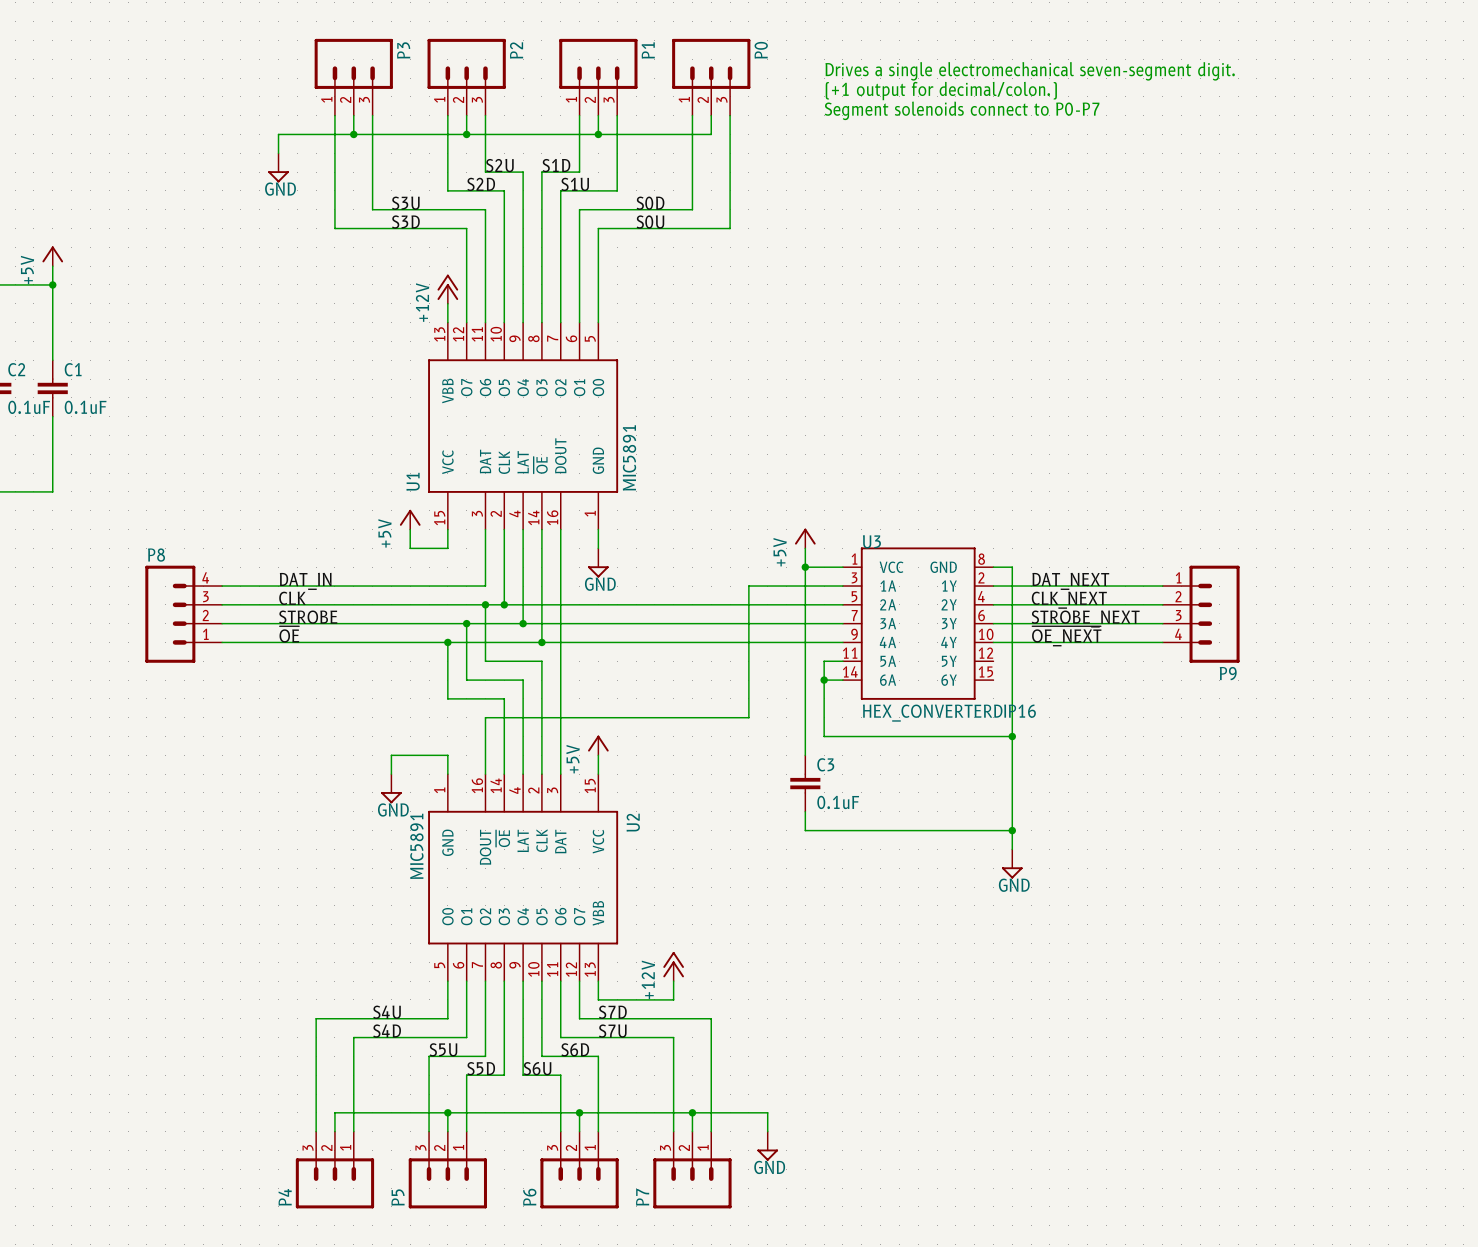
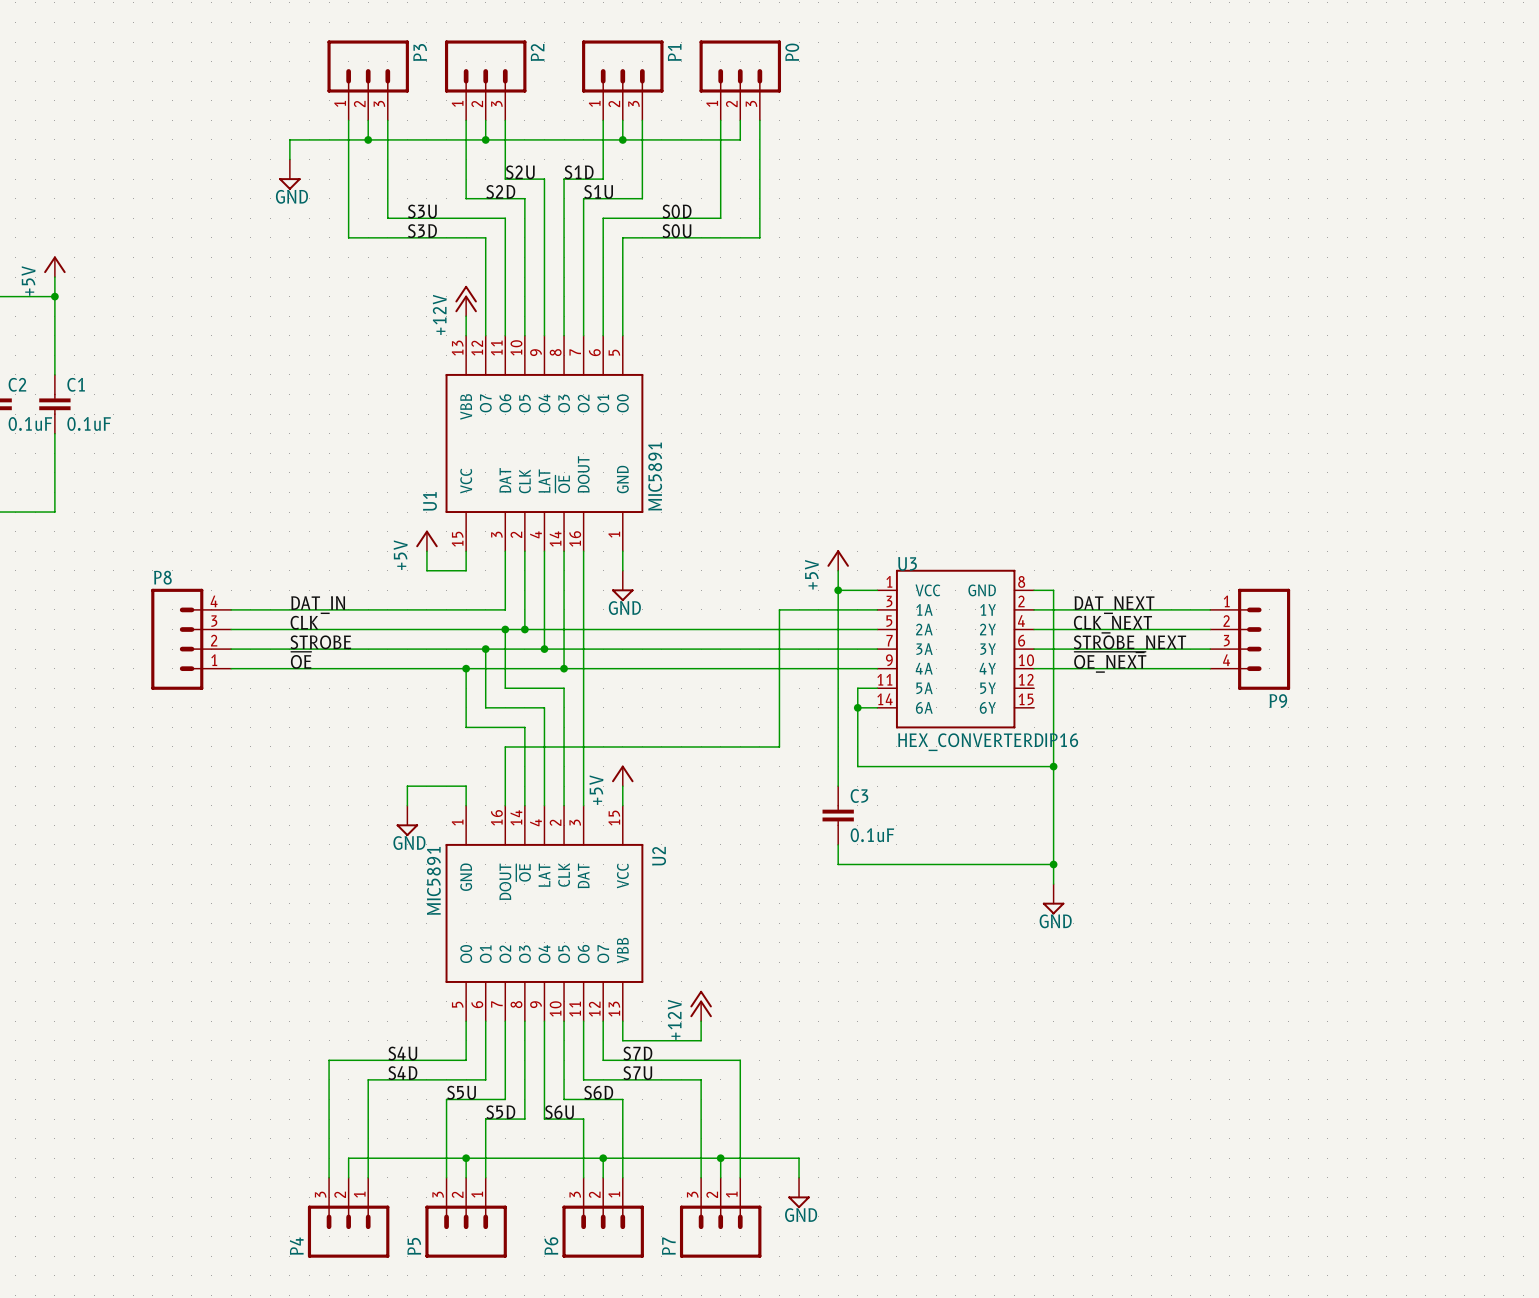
text: Drives a single electromechanical seven-segment digit. (1030, 71) -> none
text: (+1 output for decimal/colon.) (941, 91) -> none
text: Segment solenoids connect to P0-P7 (962, 110) -> none

